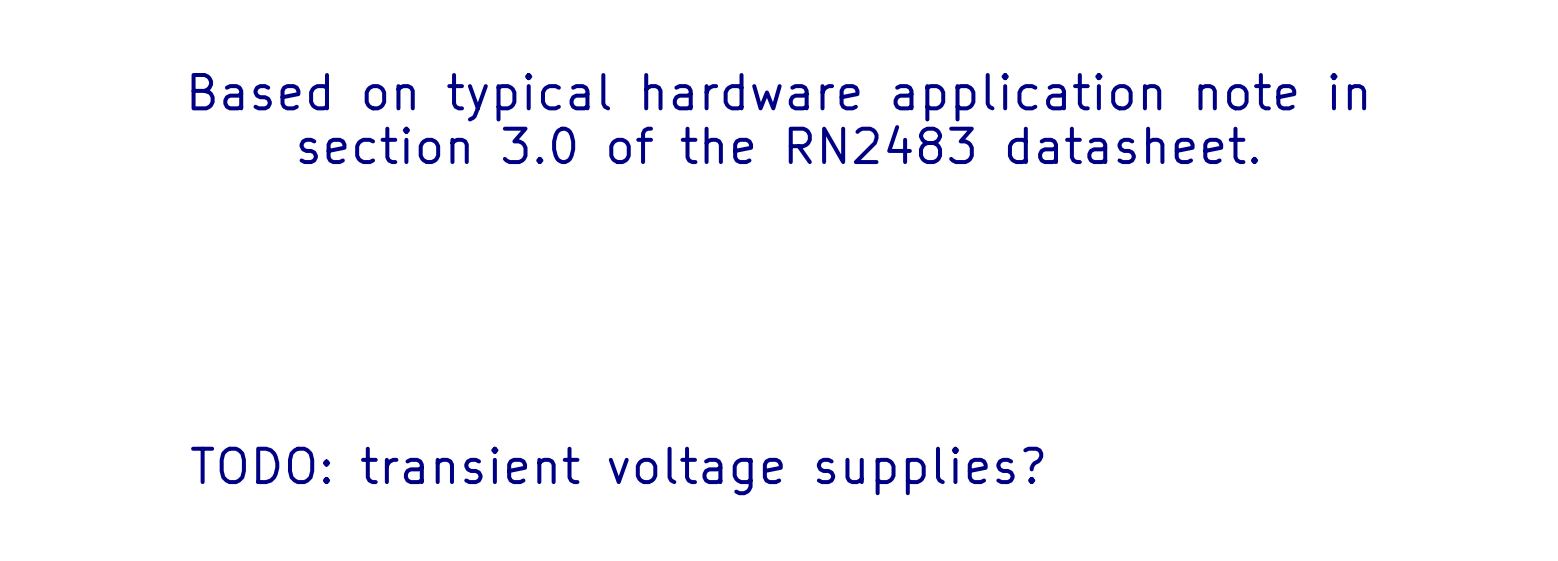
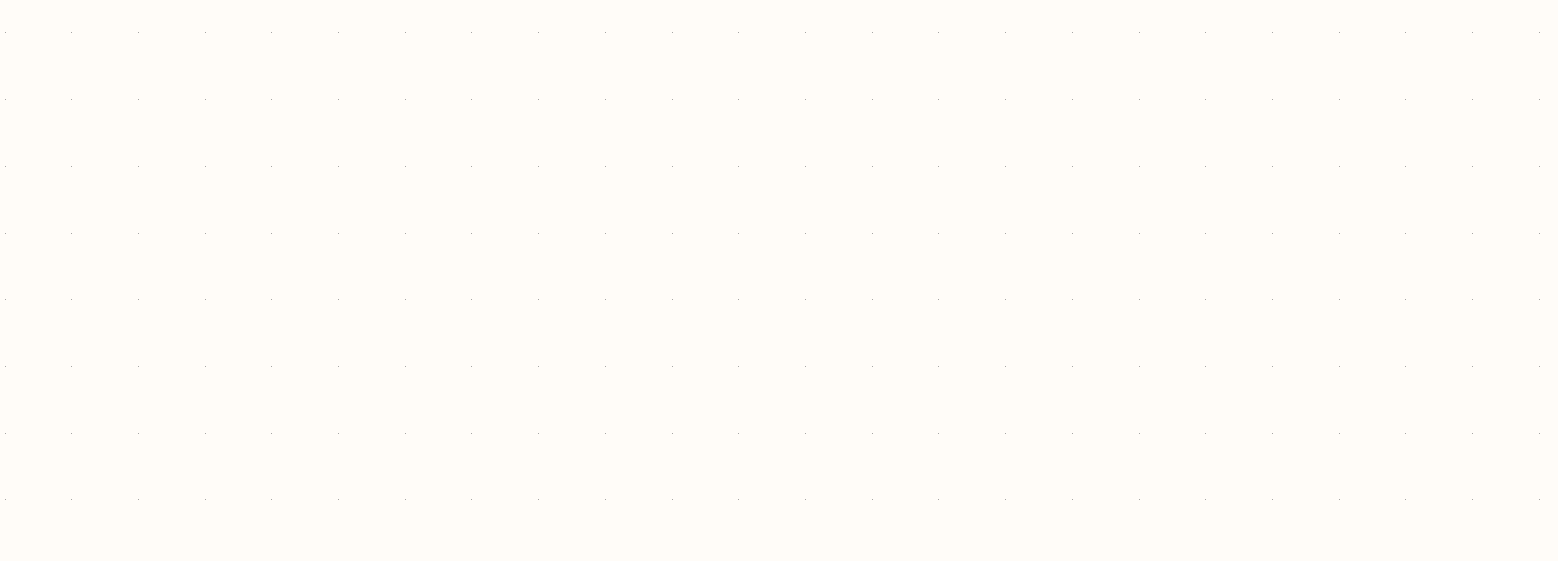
text: Based on typical hardware application note in (778, 97) -> none
text: section 3.0 of the RN2483 datasheet. (778, 144) -> none
text: TODO: transient voltage supplies? (617, 470) -> none

